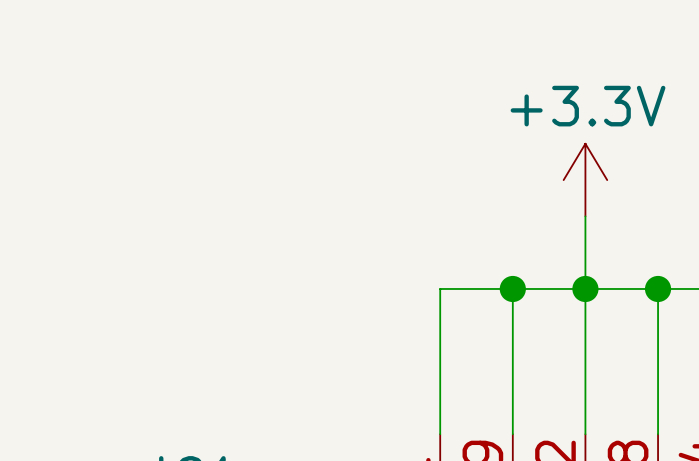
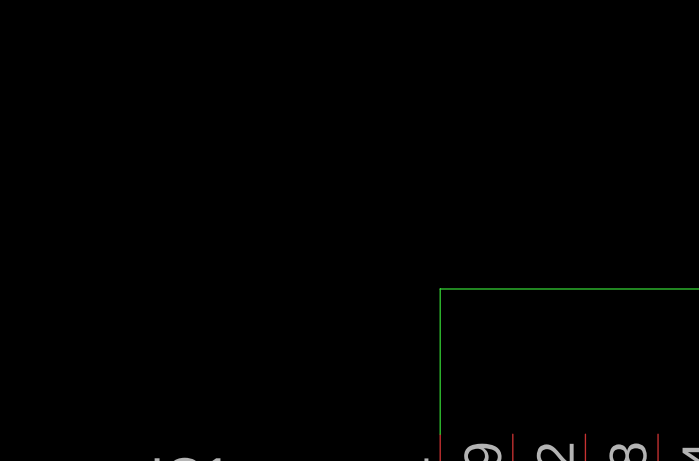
power symbol: +3.3V (585, 180) -> none
wire: (585, 216) (585, 434) -> none
wire: (512, 288) (512, 434) -> none
junction: (512, 288) -> none
junction: (585, 288) -> none
wire: (658, 288) (658, 434) -> none
junction: (658, 288) -> none

